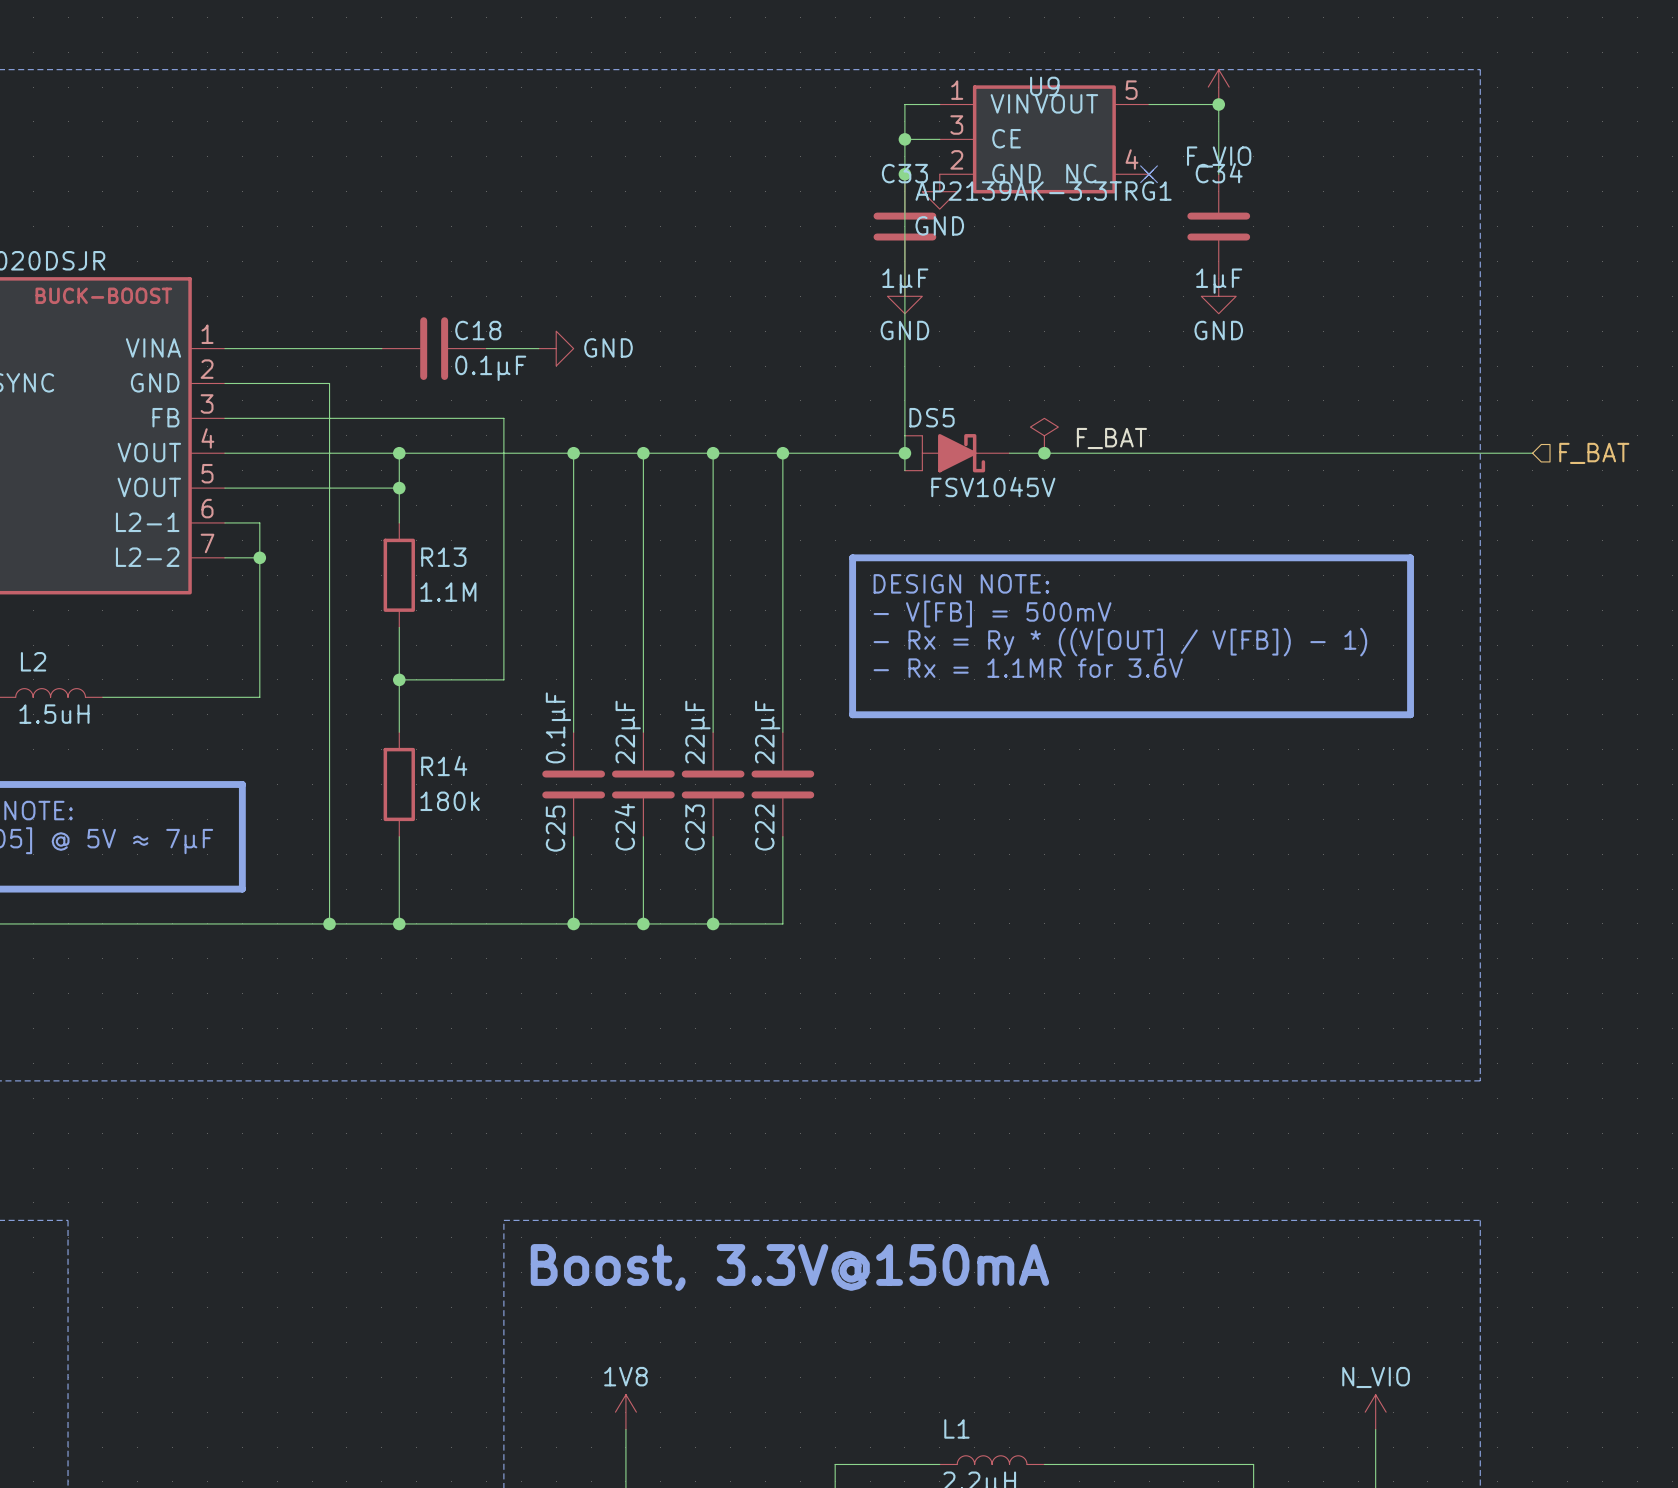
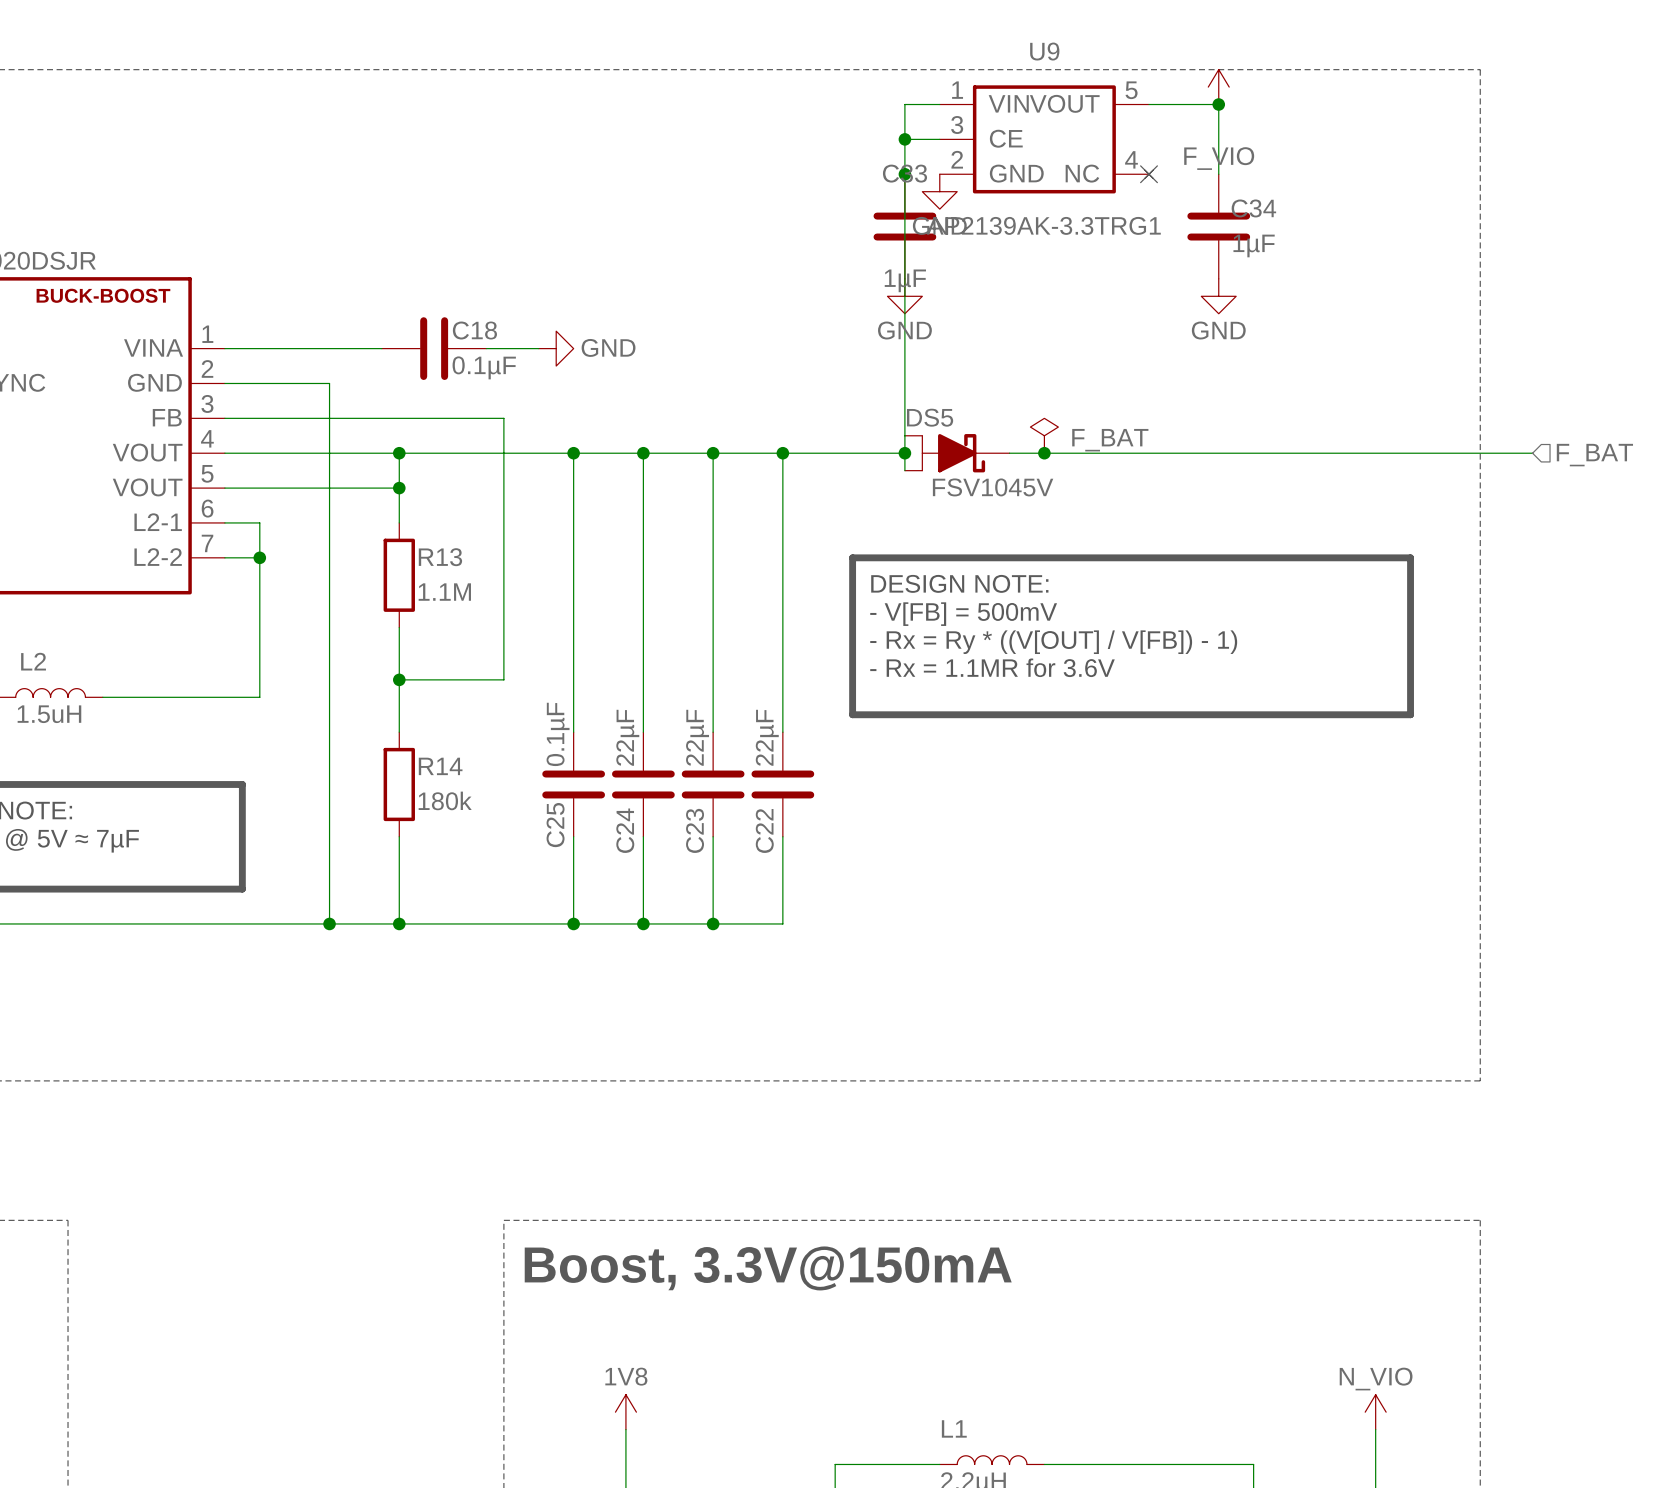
U9 name position: U9 (1044, 86) -> U9 (1044, 51)
C34 name position: C34 (1219, 173) -> C34 (1253, 208)
U9 value position: AP2139AK-3.3TRG1 (1043, 191) -> AP2139AK-3.3TRG1 (1043, 225)
C34 value position: 1µF (1219, 281) -> 1µF (1254, 245)

